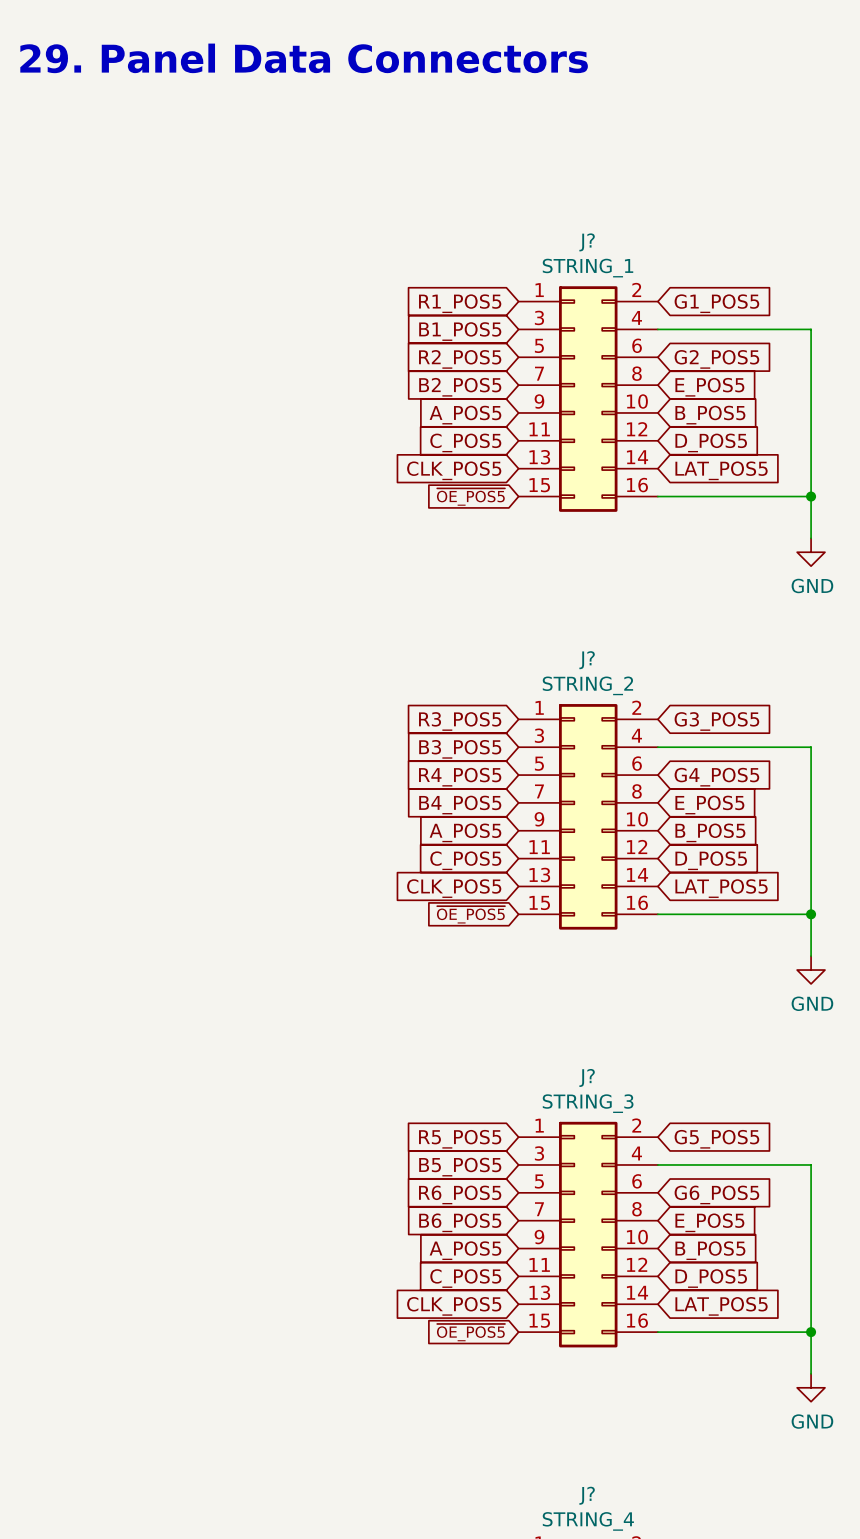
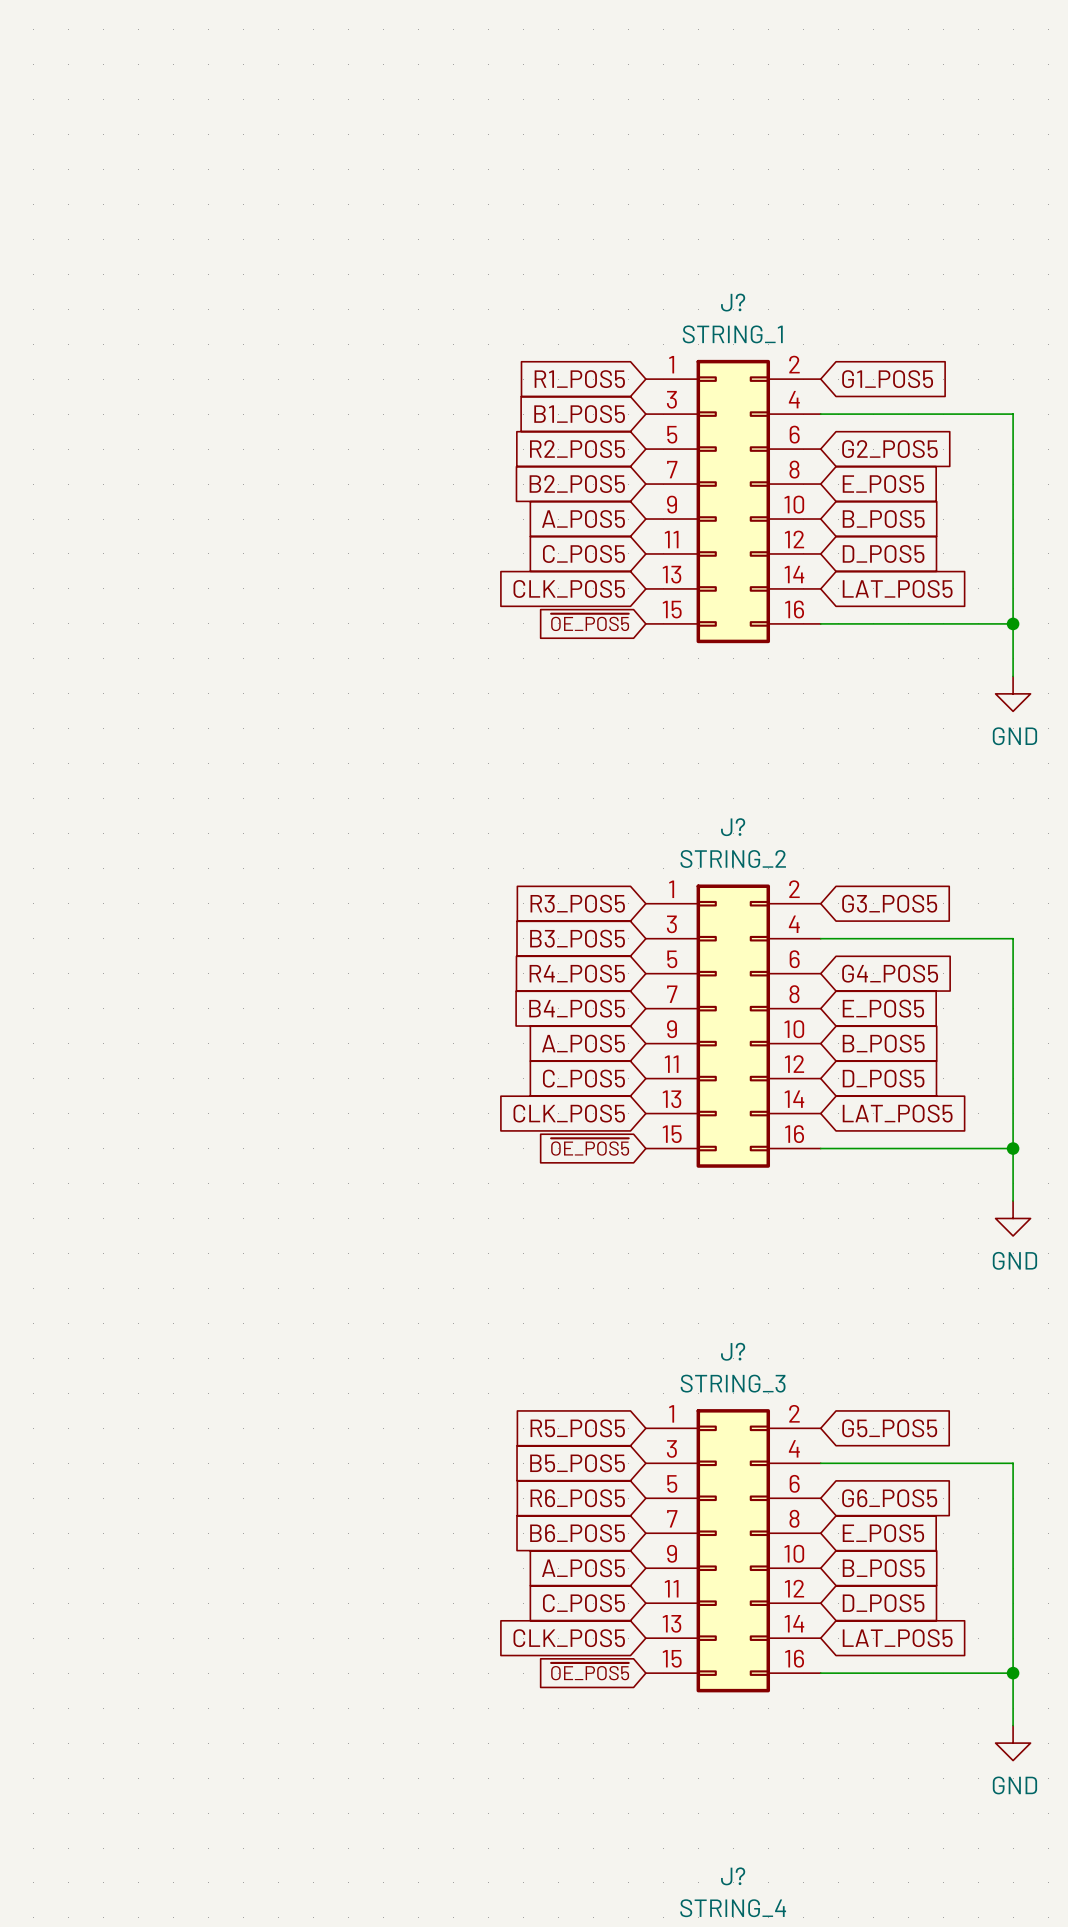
text: 29. Panel Data Connectors (304, 58) -> none

